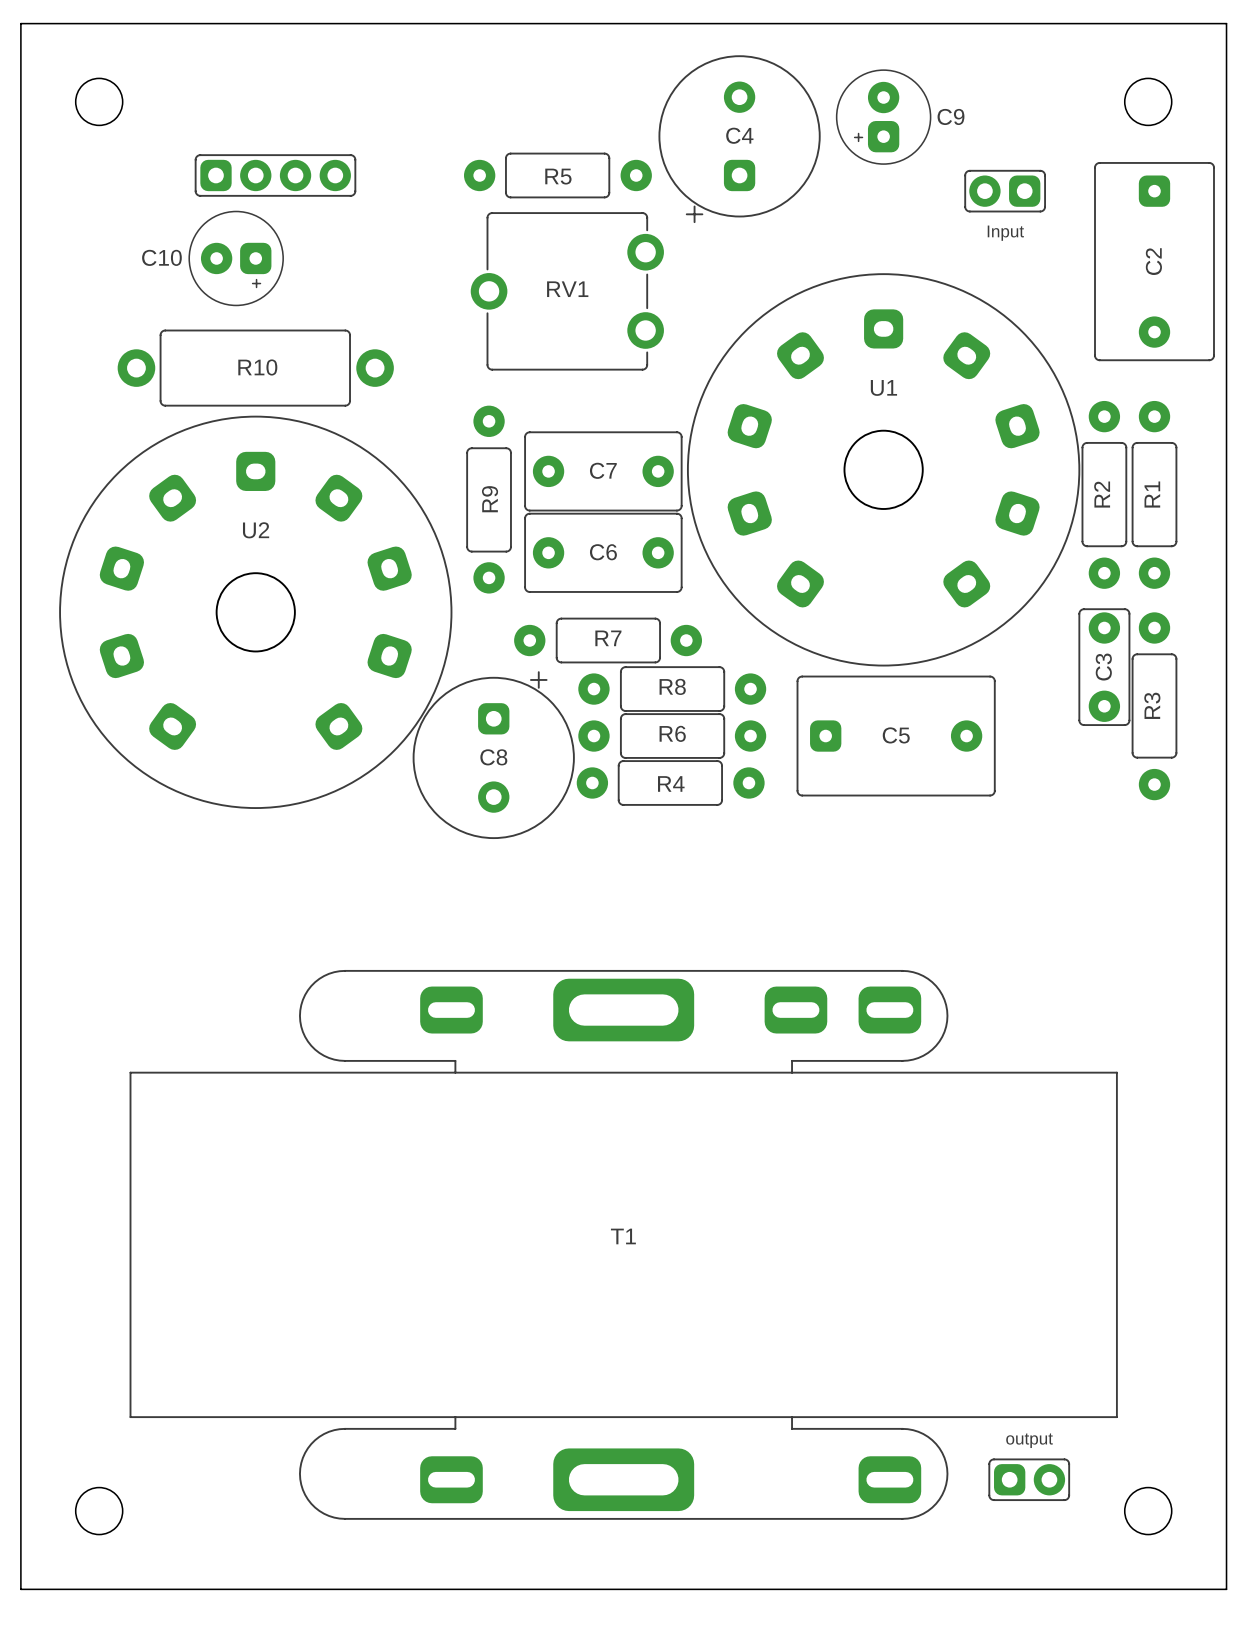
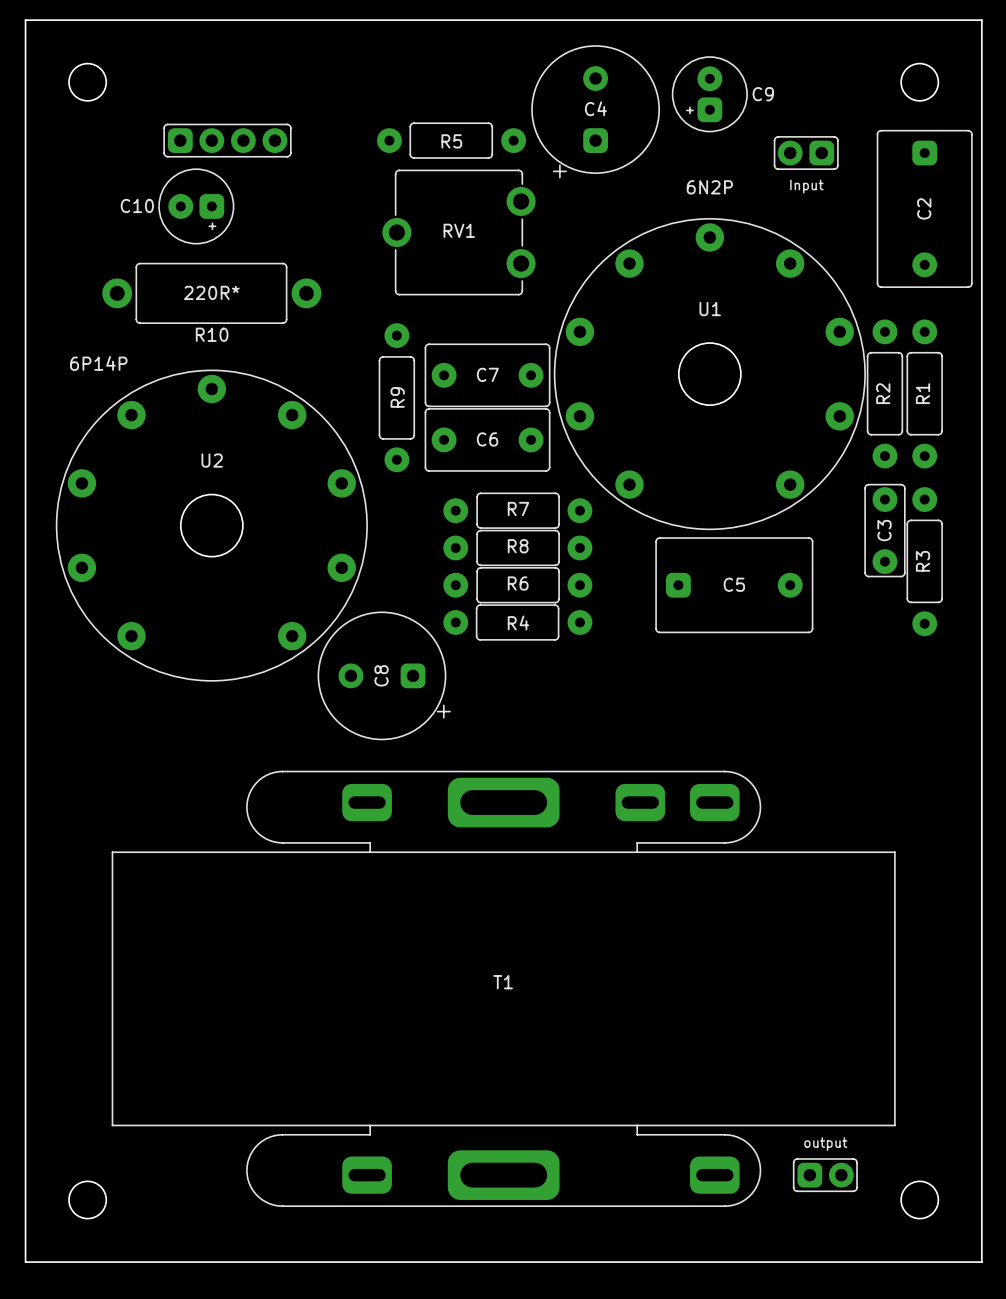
U1 value: none -> 6N2P (709, 187)
U1 footprint: [686, 273, 1081, 667] -> [553, 218, 866, 531]
R10 value: none -> 220R* (211, 292)
R10 name position: R10 (257, 367) -> R10 (212, 334)
U2 footprint: [59, 415, 453, 809] -> [55, 369, 368, 682]
U2 value: none -> 6P14P (98, 363)
R7 position: (608, 640) -> (517, 510)
R8 position: (672, 689) -> (517, 547)
R6 position: (672, 736) -> (517, 585)
C5 position: (896, 736) -> (734, 585)
C8 rotation: 0° (493, 755) -> 90° clockwise (384, 675)
R4 position: (670, 783) -> (517, 622)

